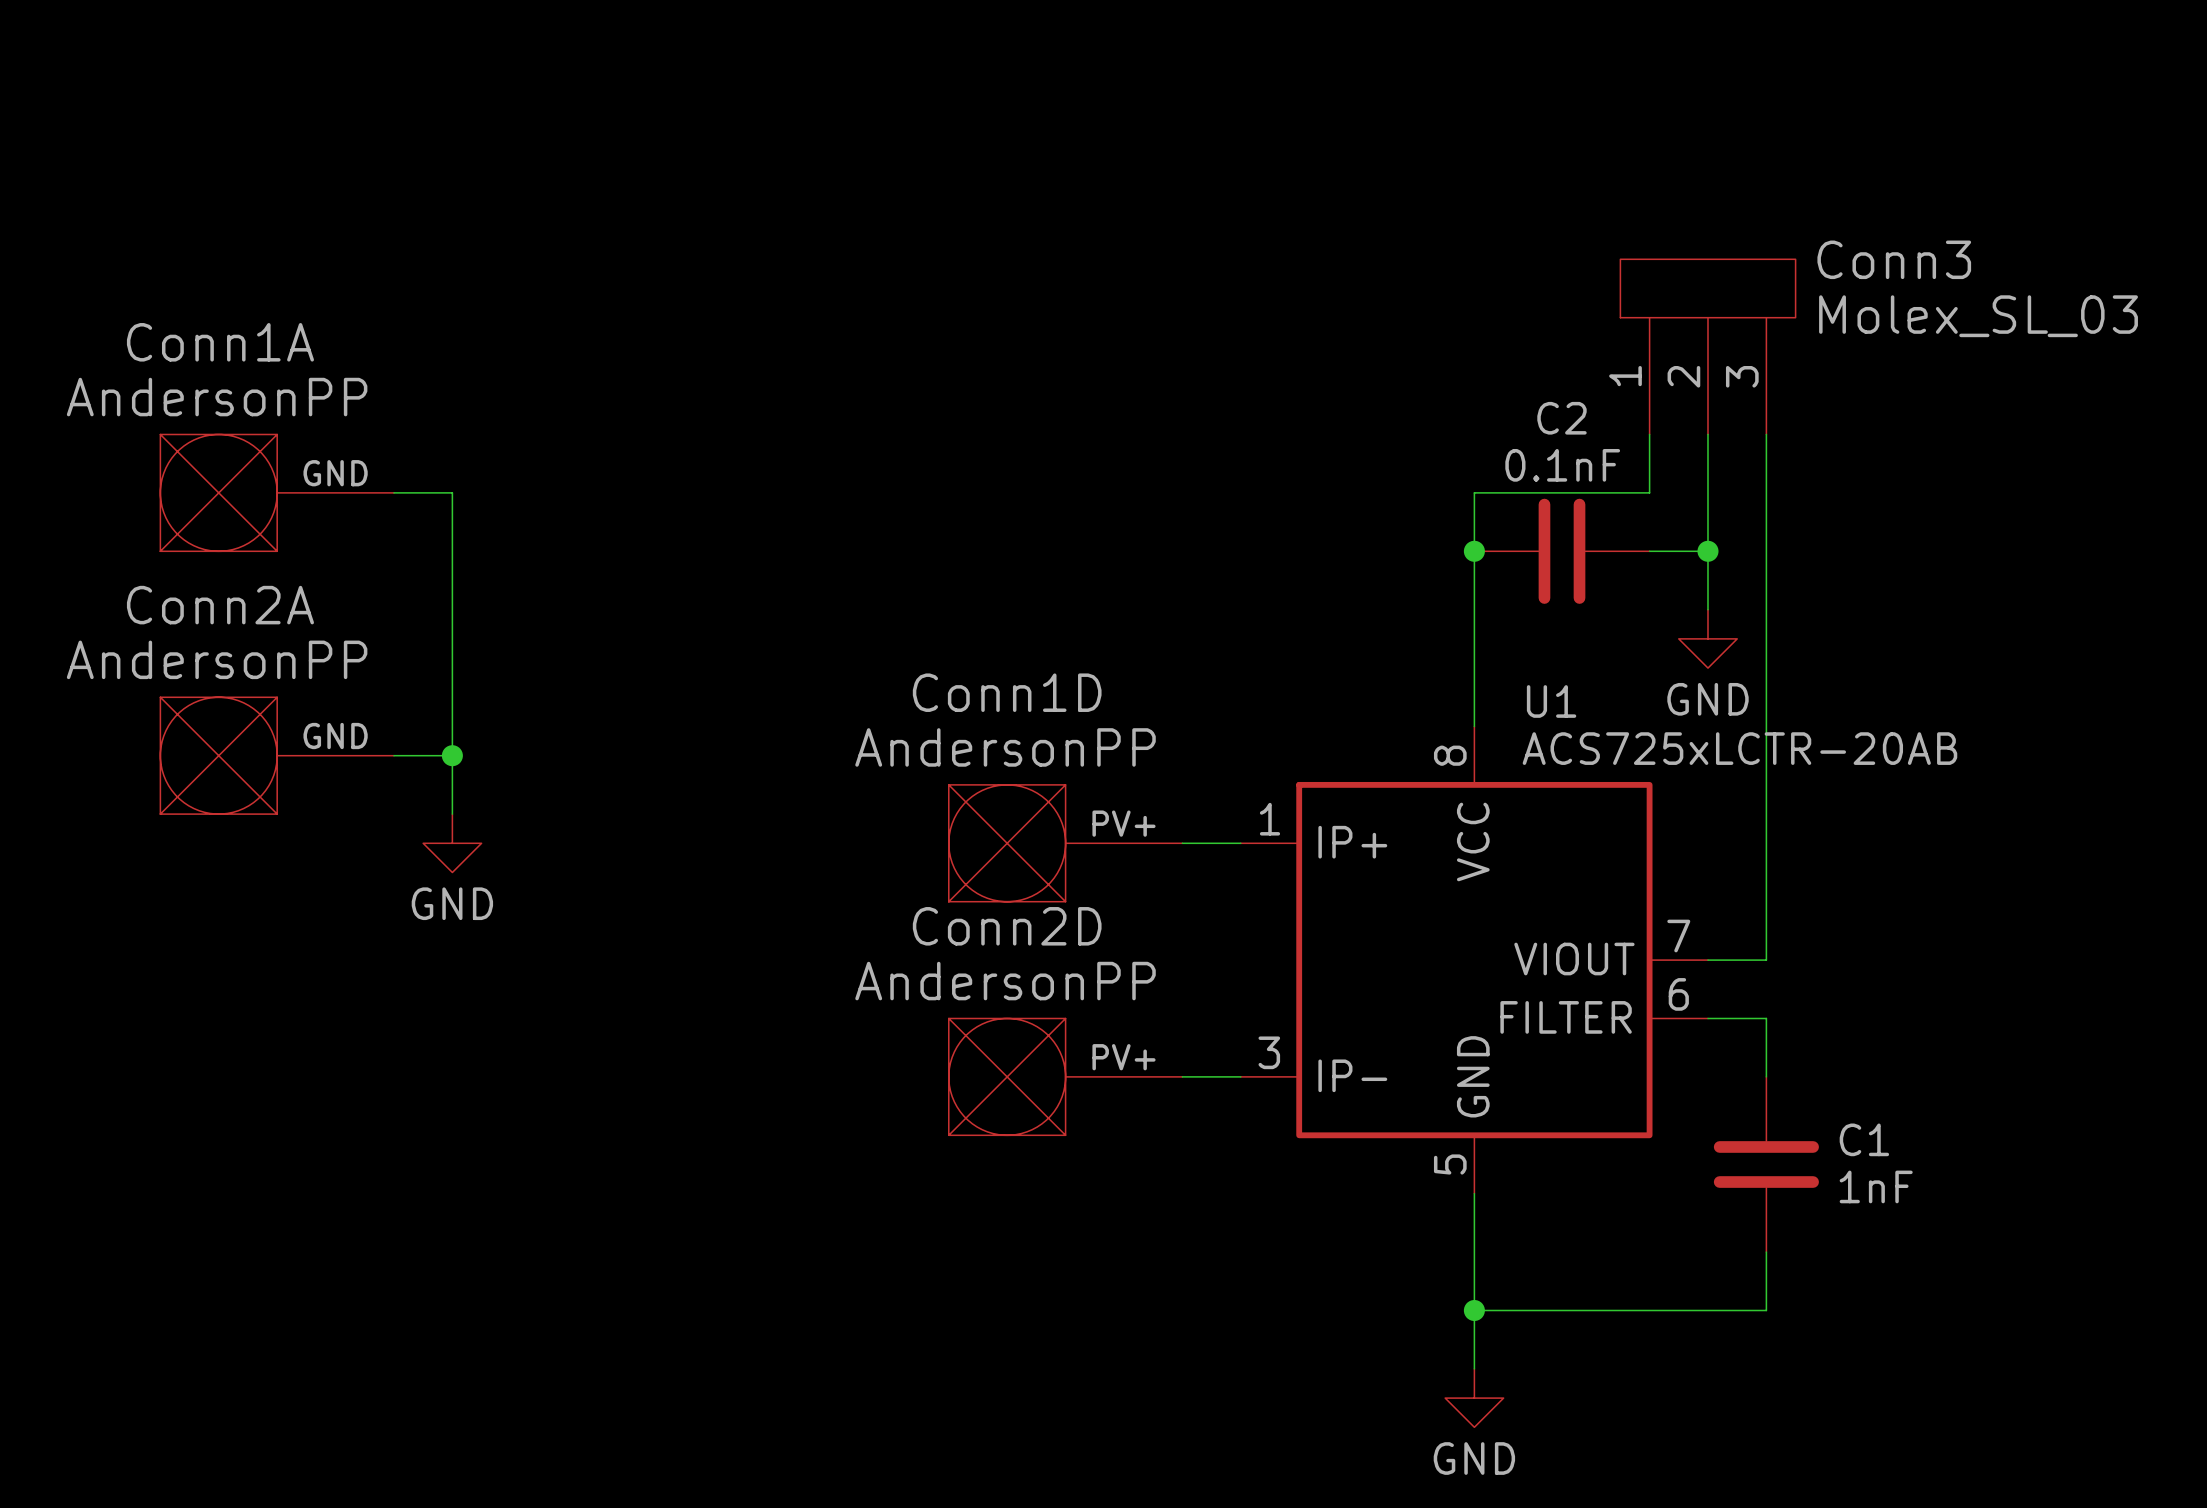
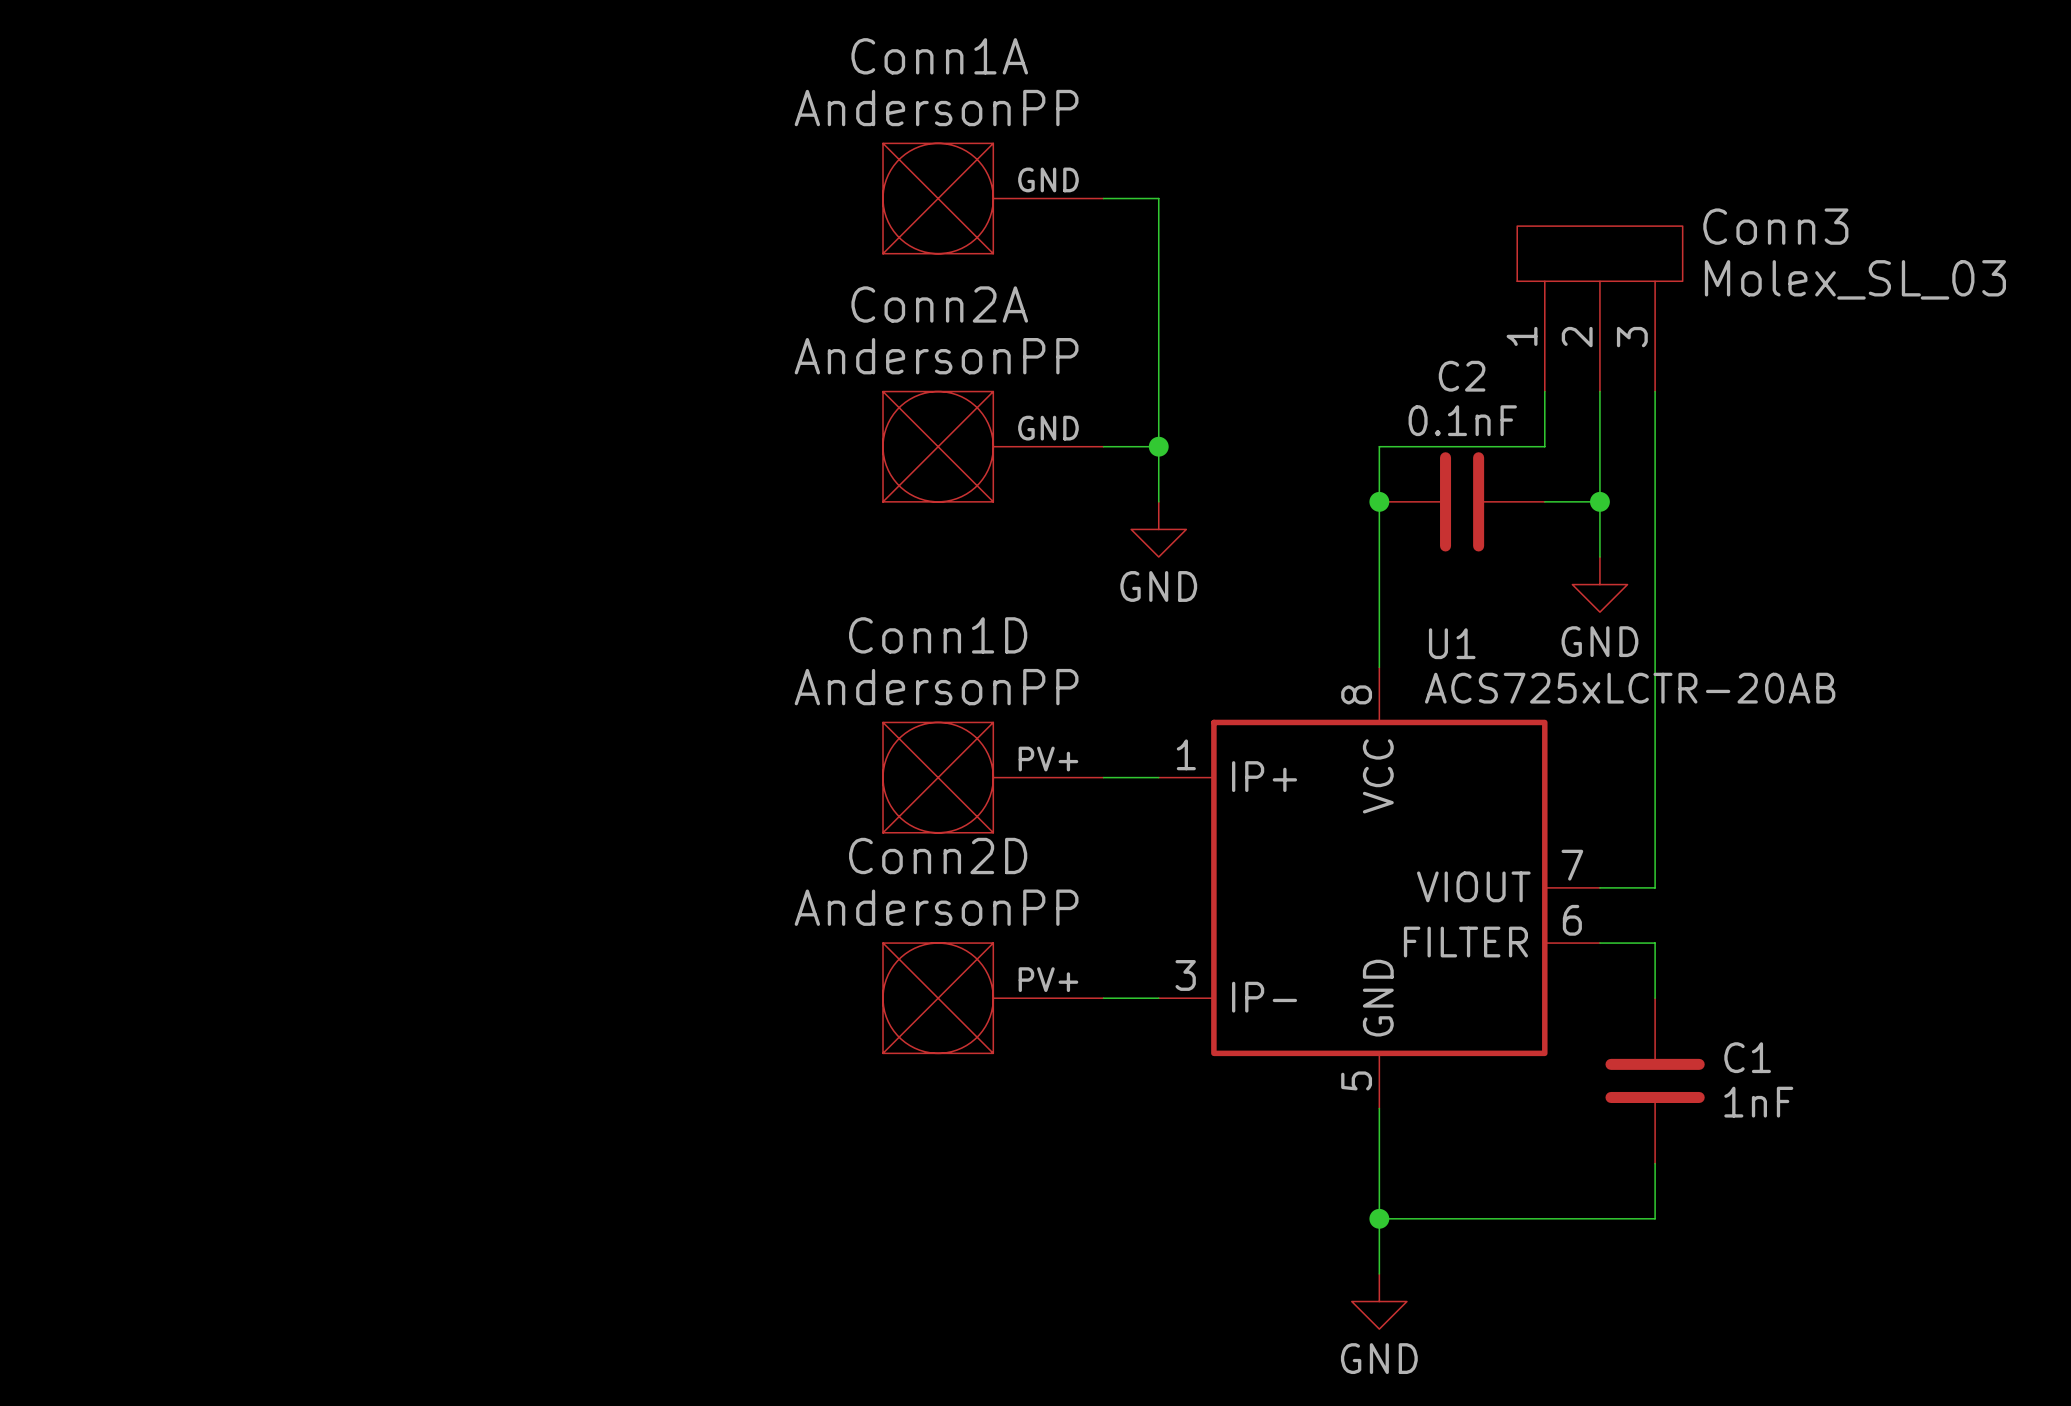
wire: none -> (1103, 198) (1158, 198) (1158, 501)
Conn1A position: (277, 492) -> (993, 198)
wire: (393, 492) (452, 492) (452, 814) -> none
wire: none -> (1103, 446) (1158, 446)
junction: none -> (1158, 446)
power symbol: none -> GND (1158, 529)
Conn2A position: (277, 755) -> (993, 446)
wire: (393, 755) (452, 755) -> none
junction: (452, 755) -> none
power symbol: GND (452, 843) -> none

